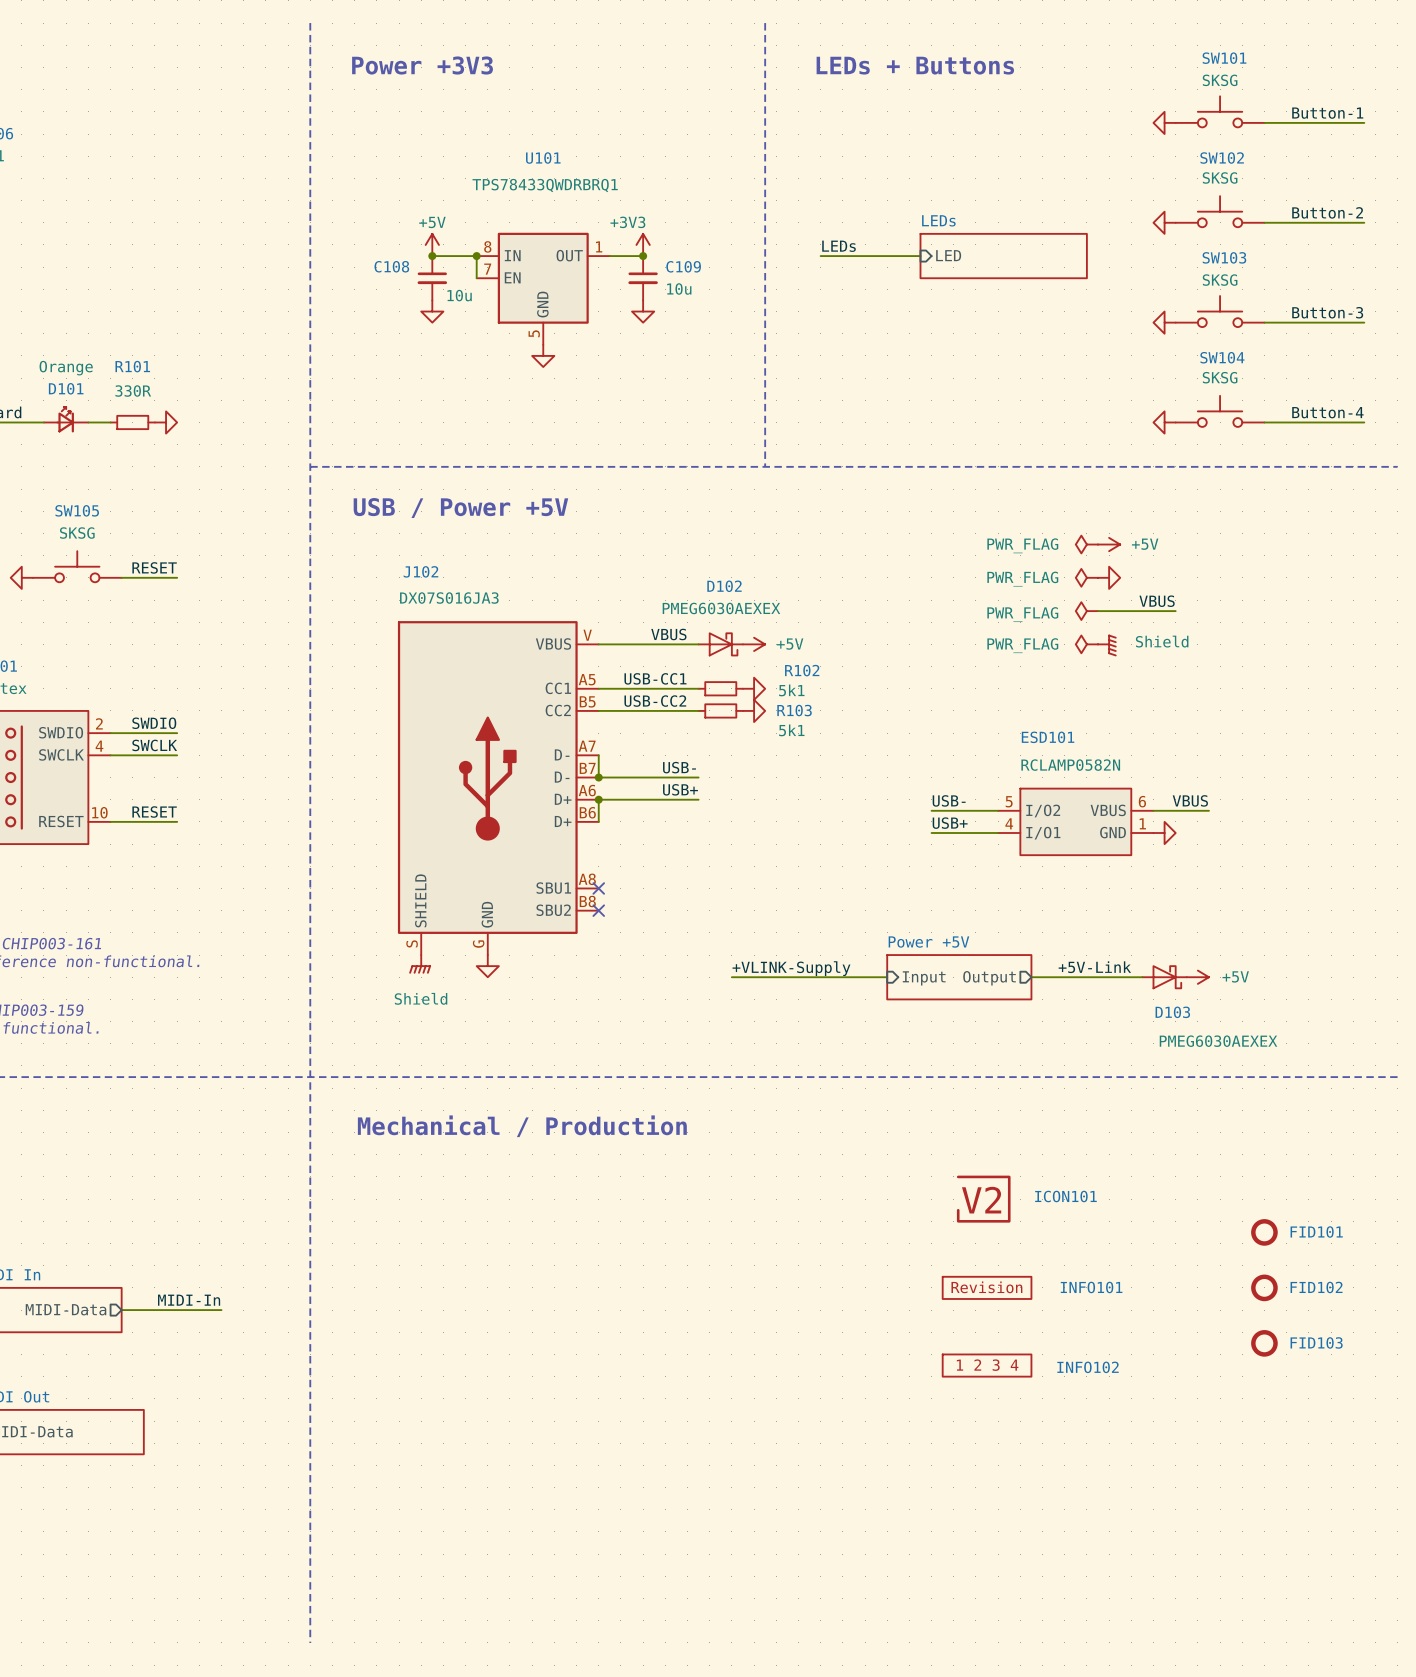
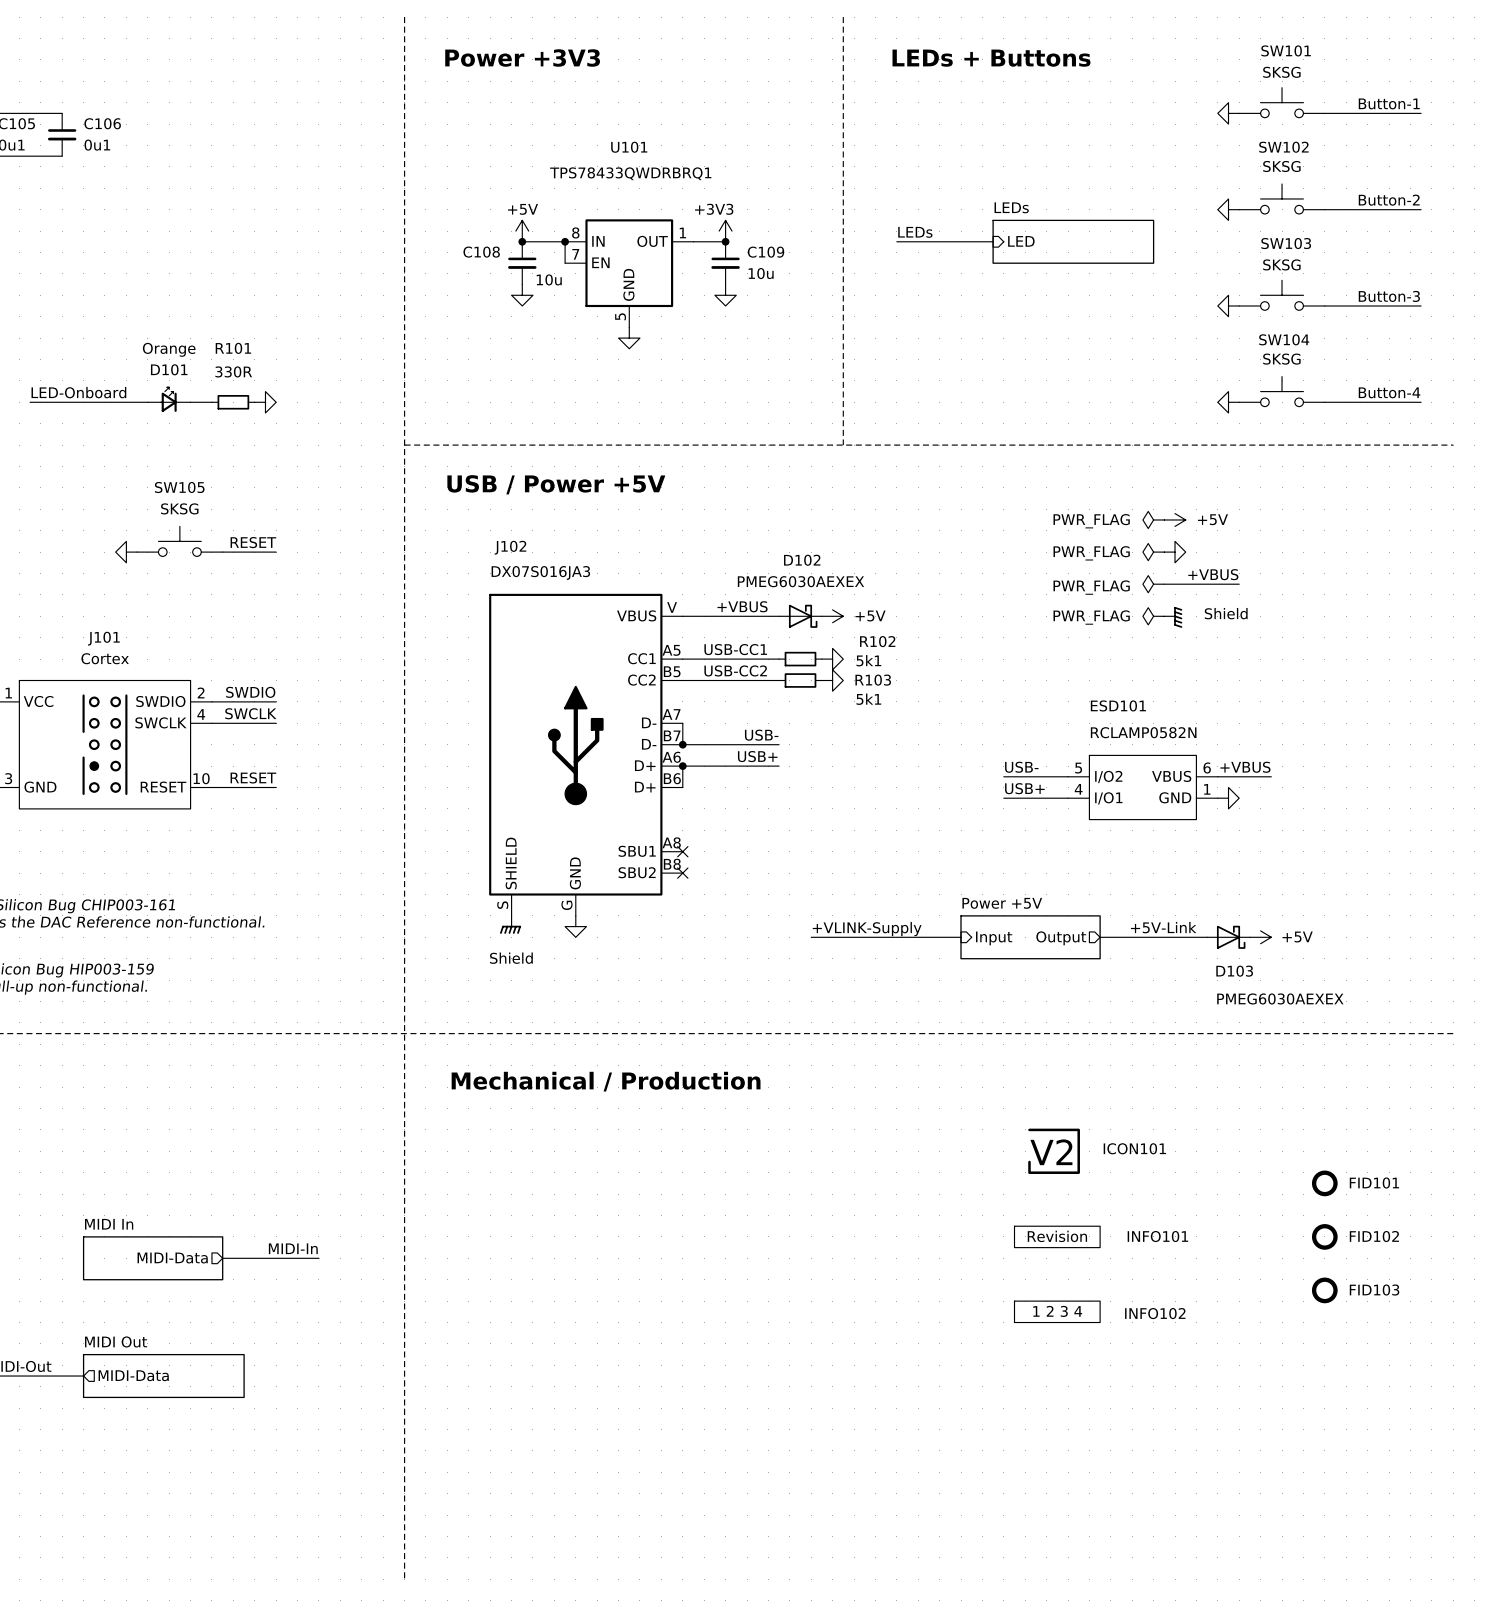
label: VBUS (1157, 601) -> +VBUS (1213, 574)
label: VBUS (668, 634) -> +VBUS (742, 606)
label: VBUS (1190, 800) -> +VBUS (1245, 767)

